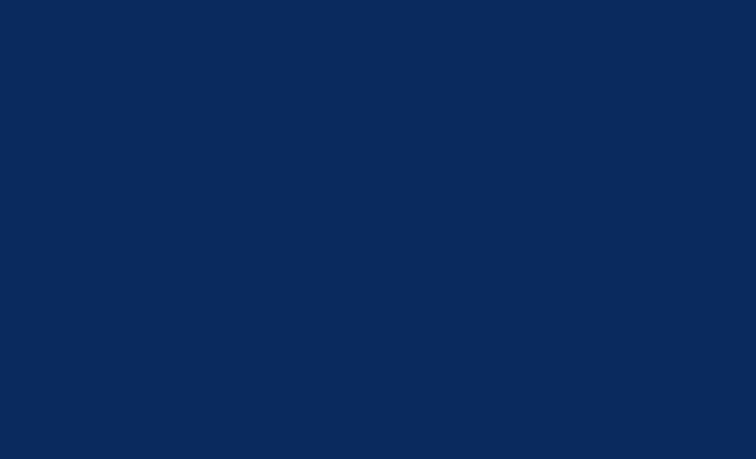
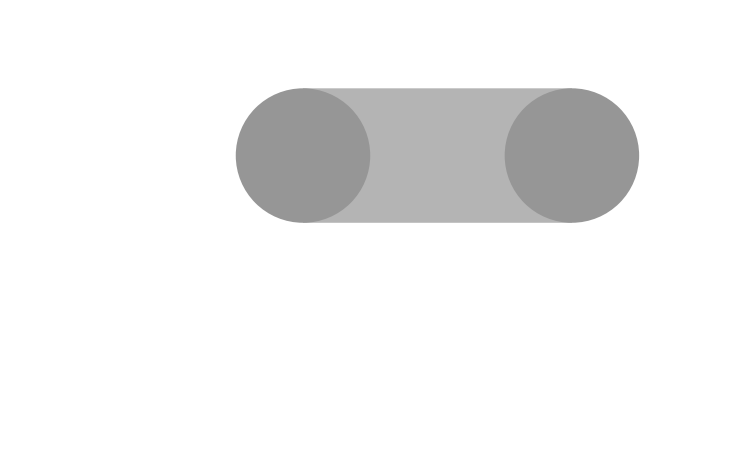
part: none -> (437, 155)

